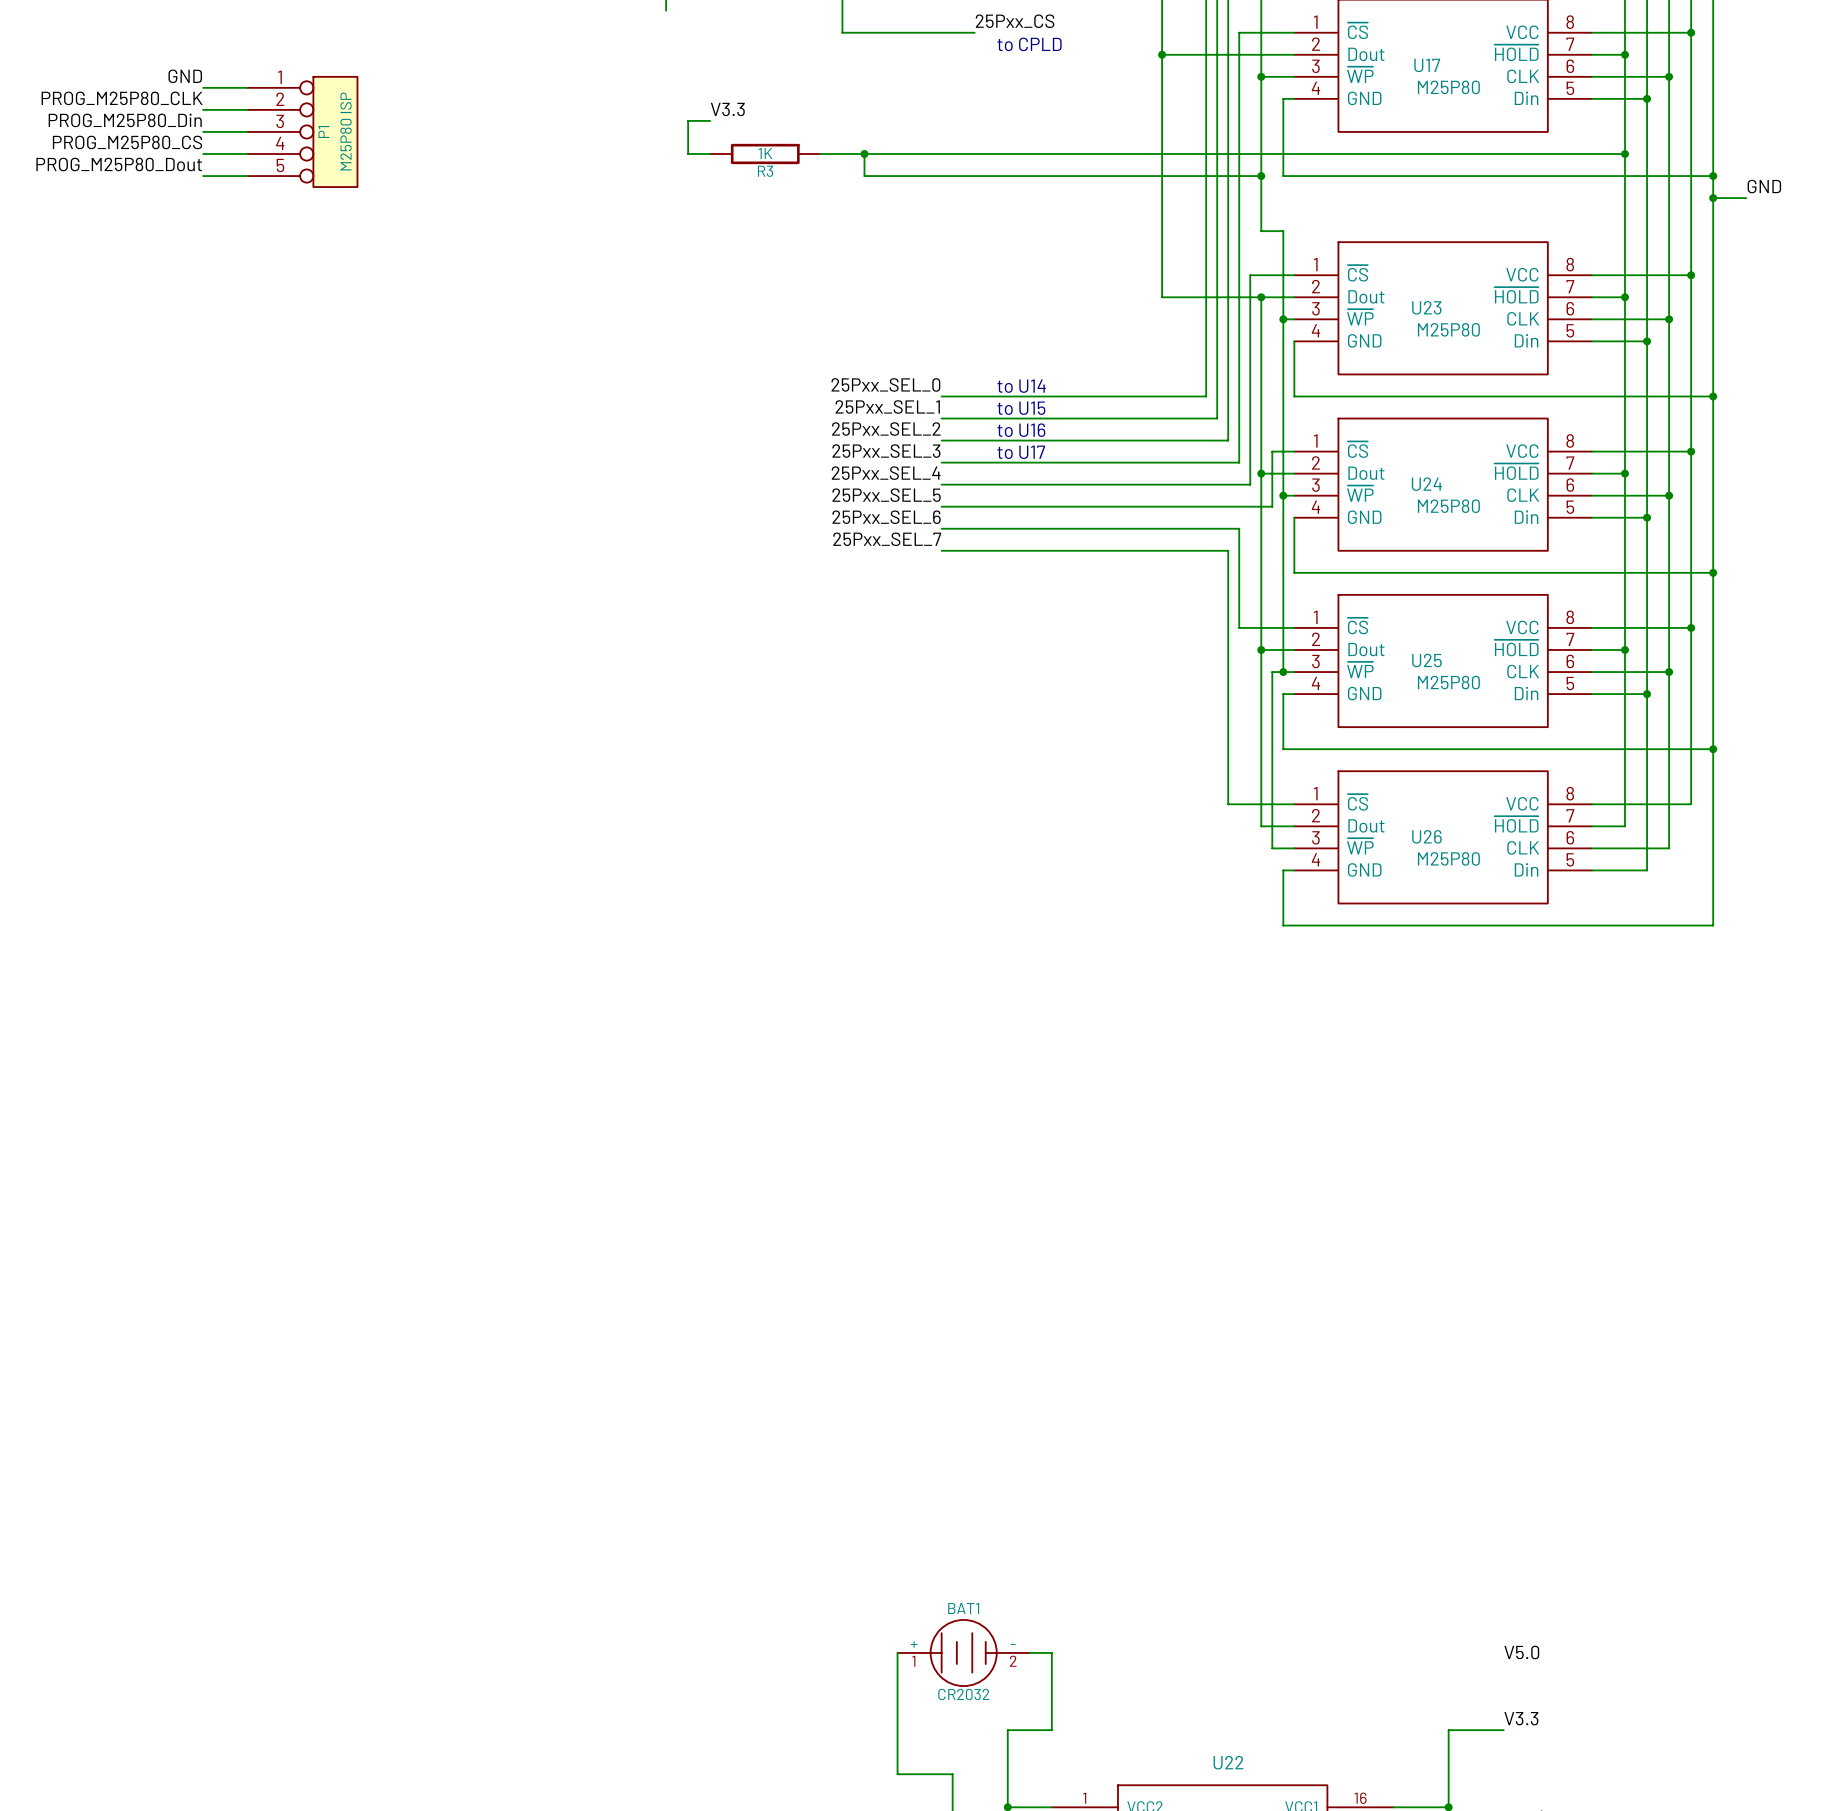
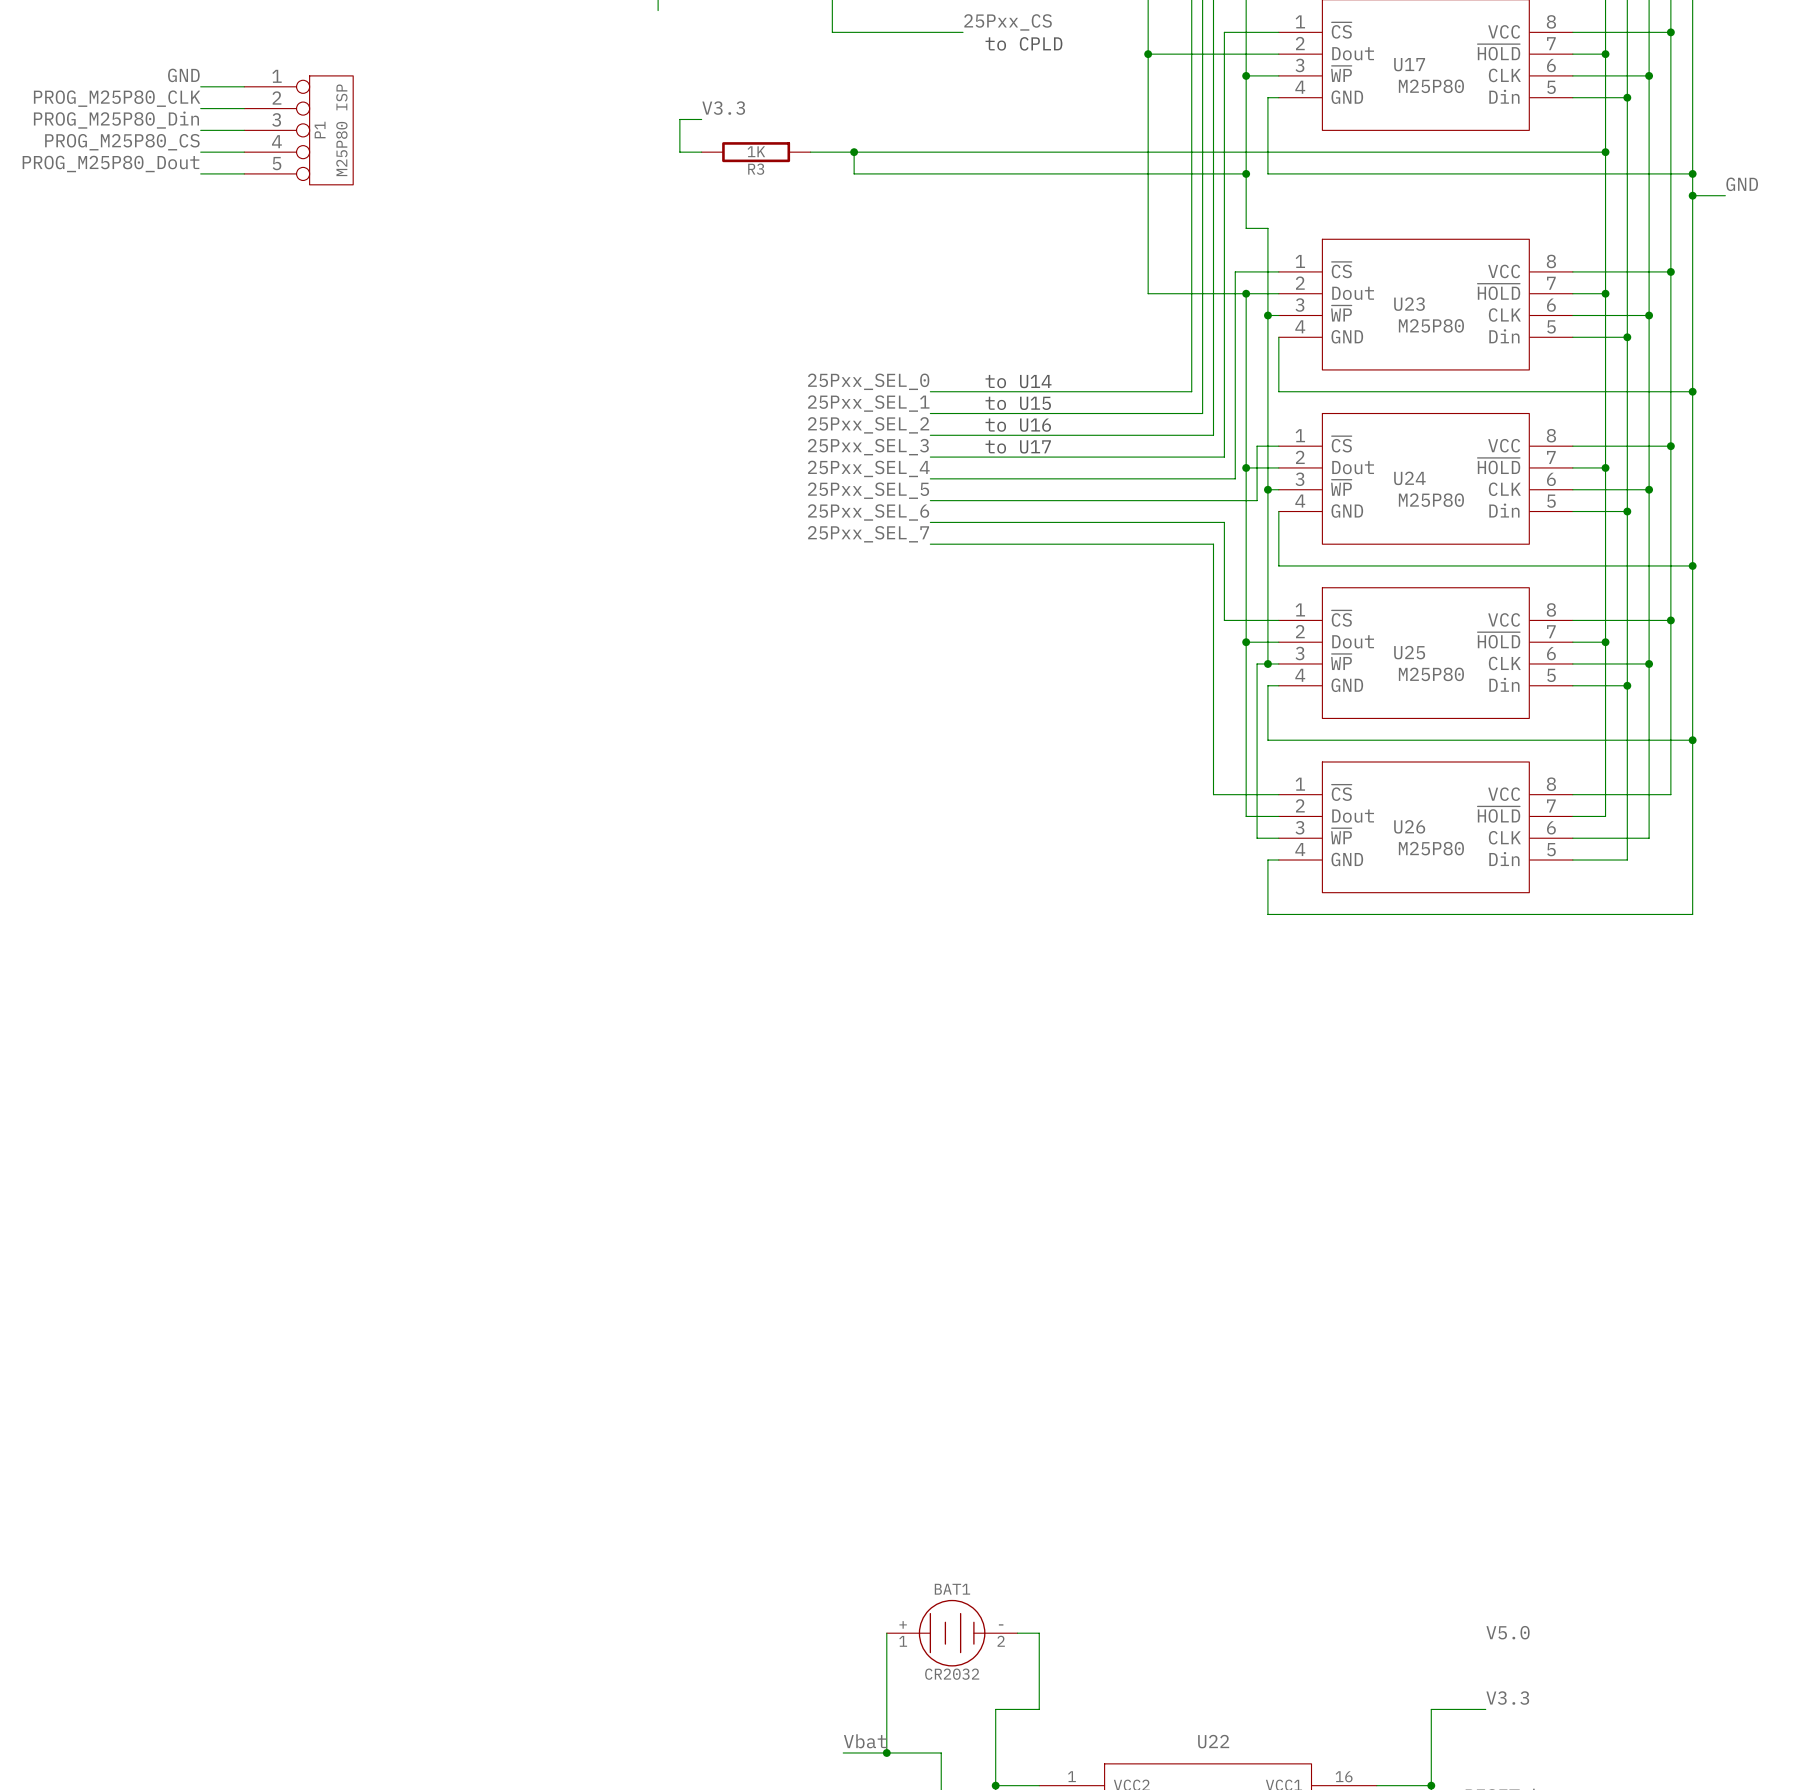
label: none -> Vbat (865, 1741)
wire: none -> (843, 1752) (886, 1752)
junction: none -> (886, 1752)

